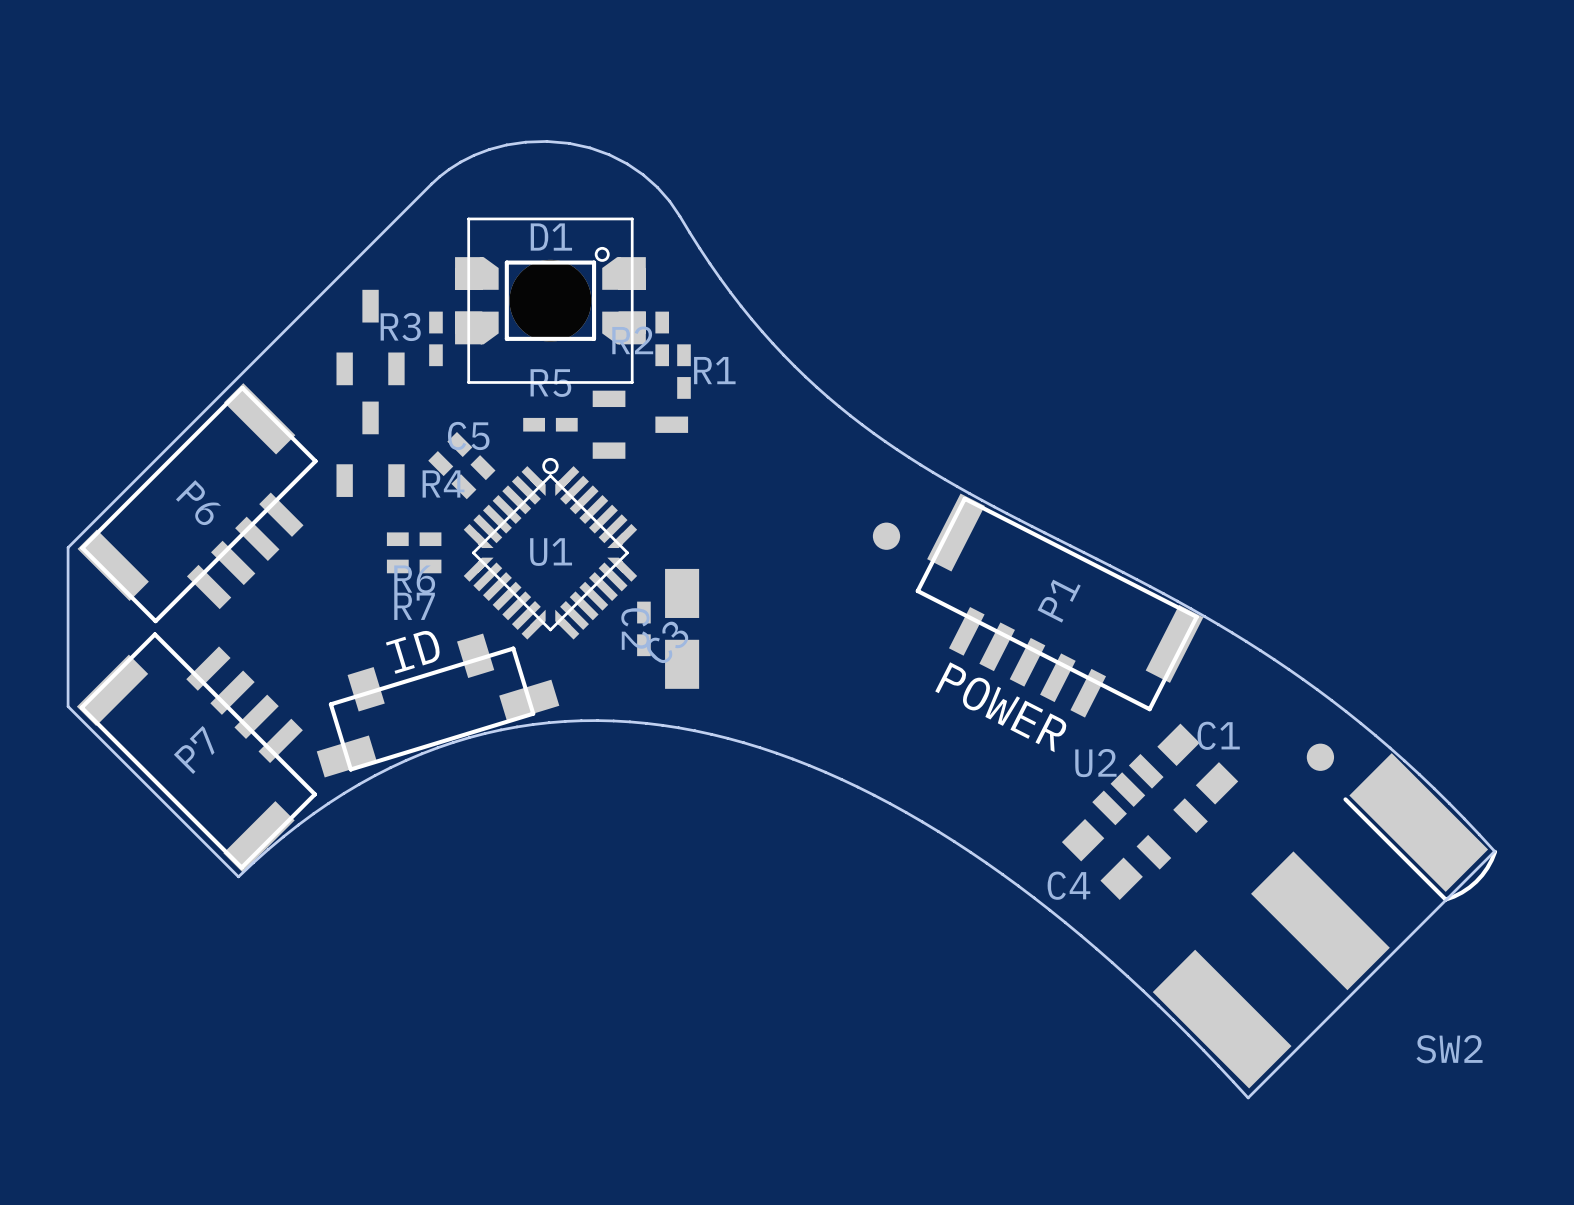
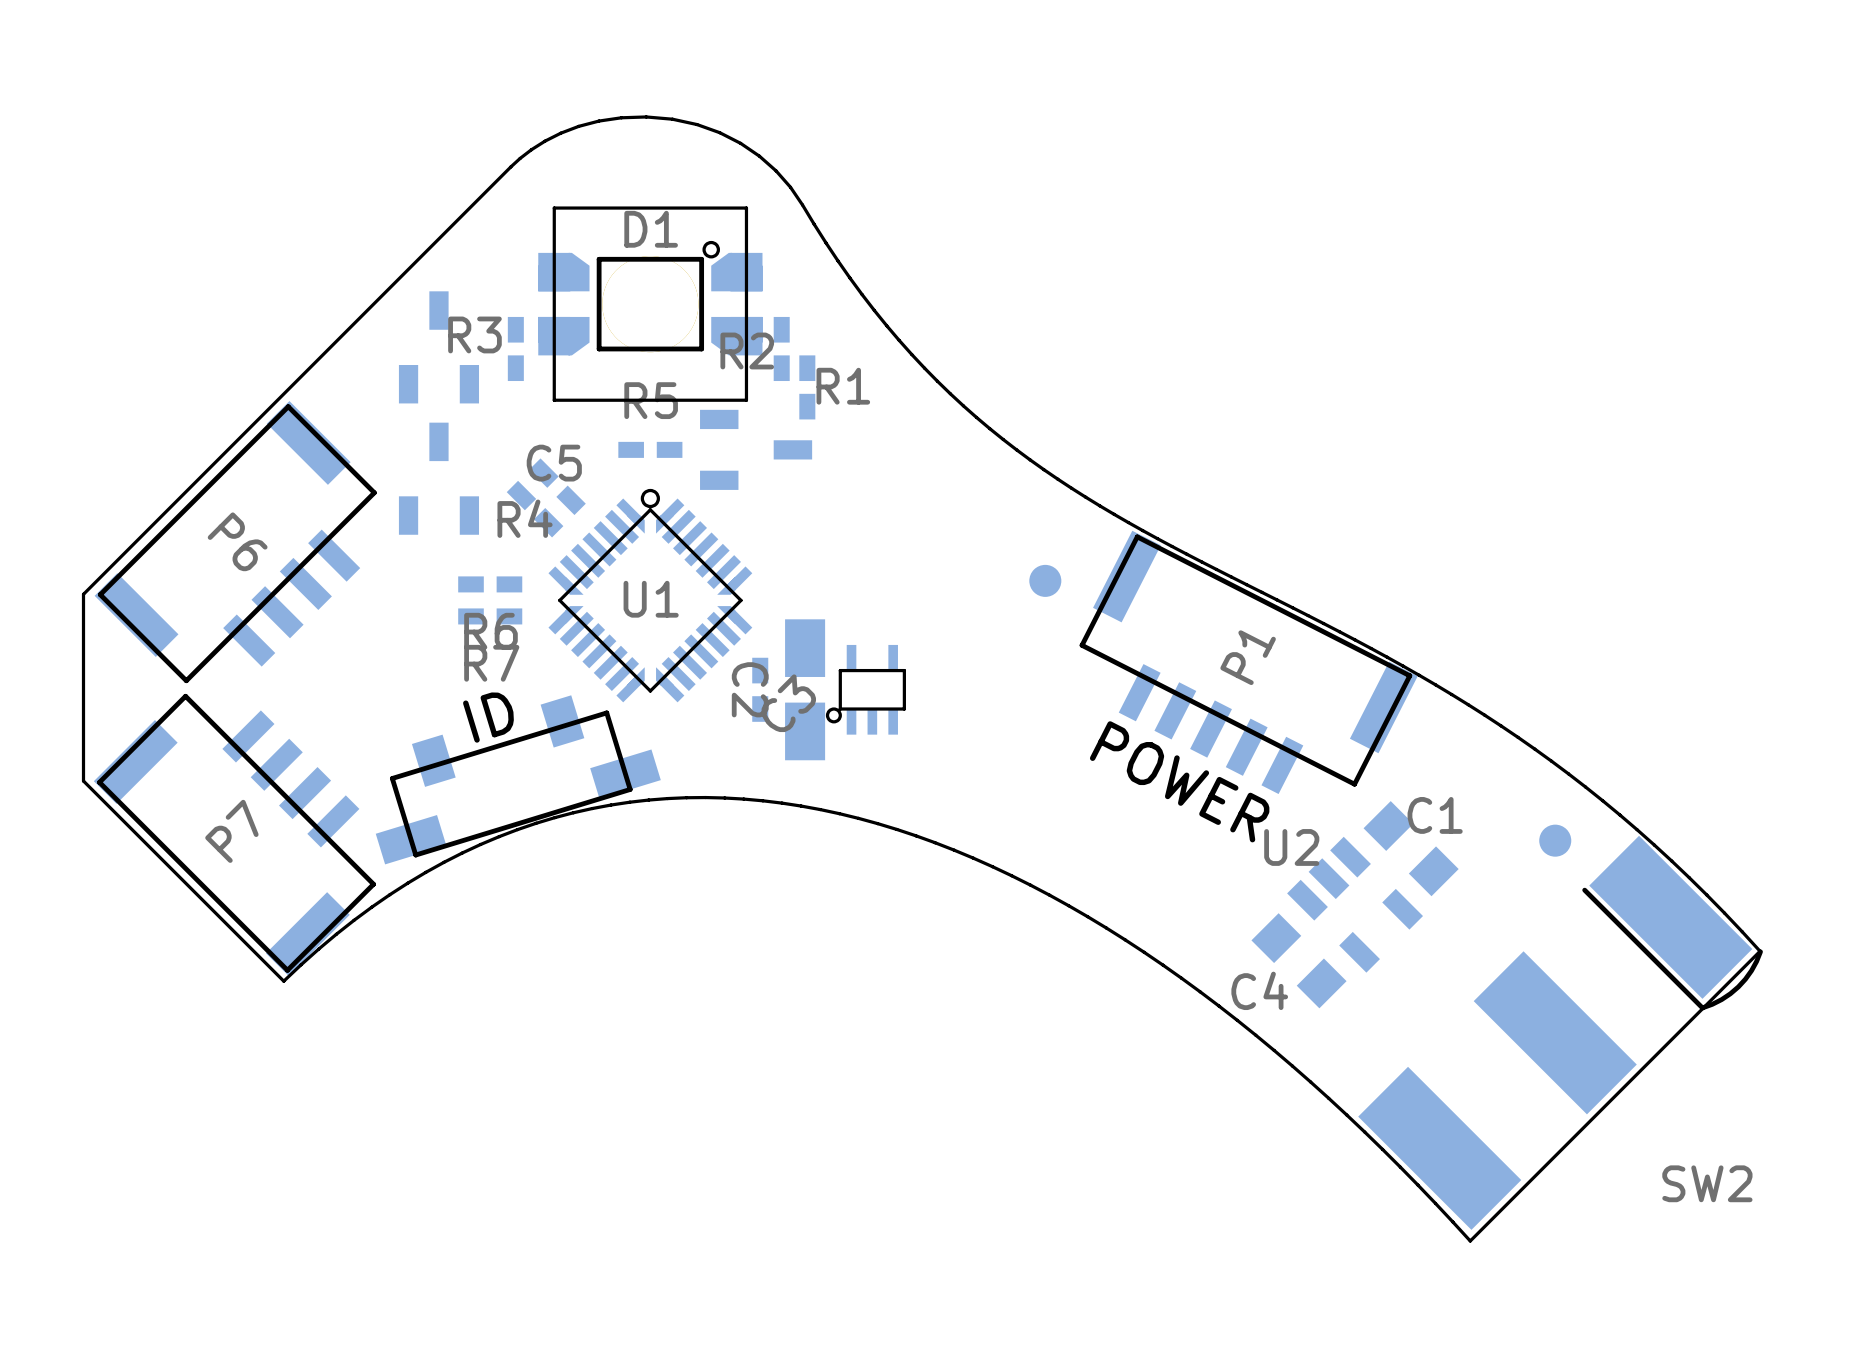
part: none -> (865, 689)

